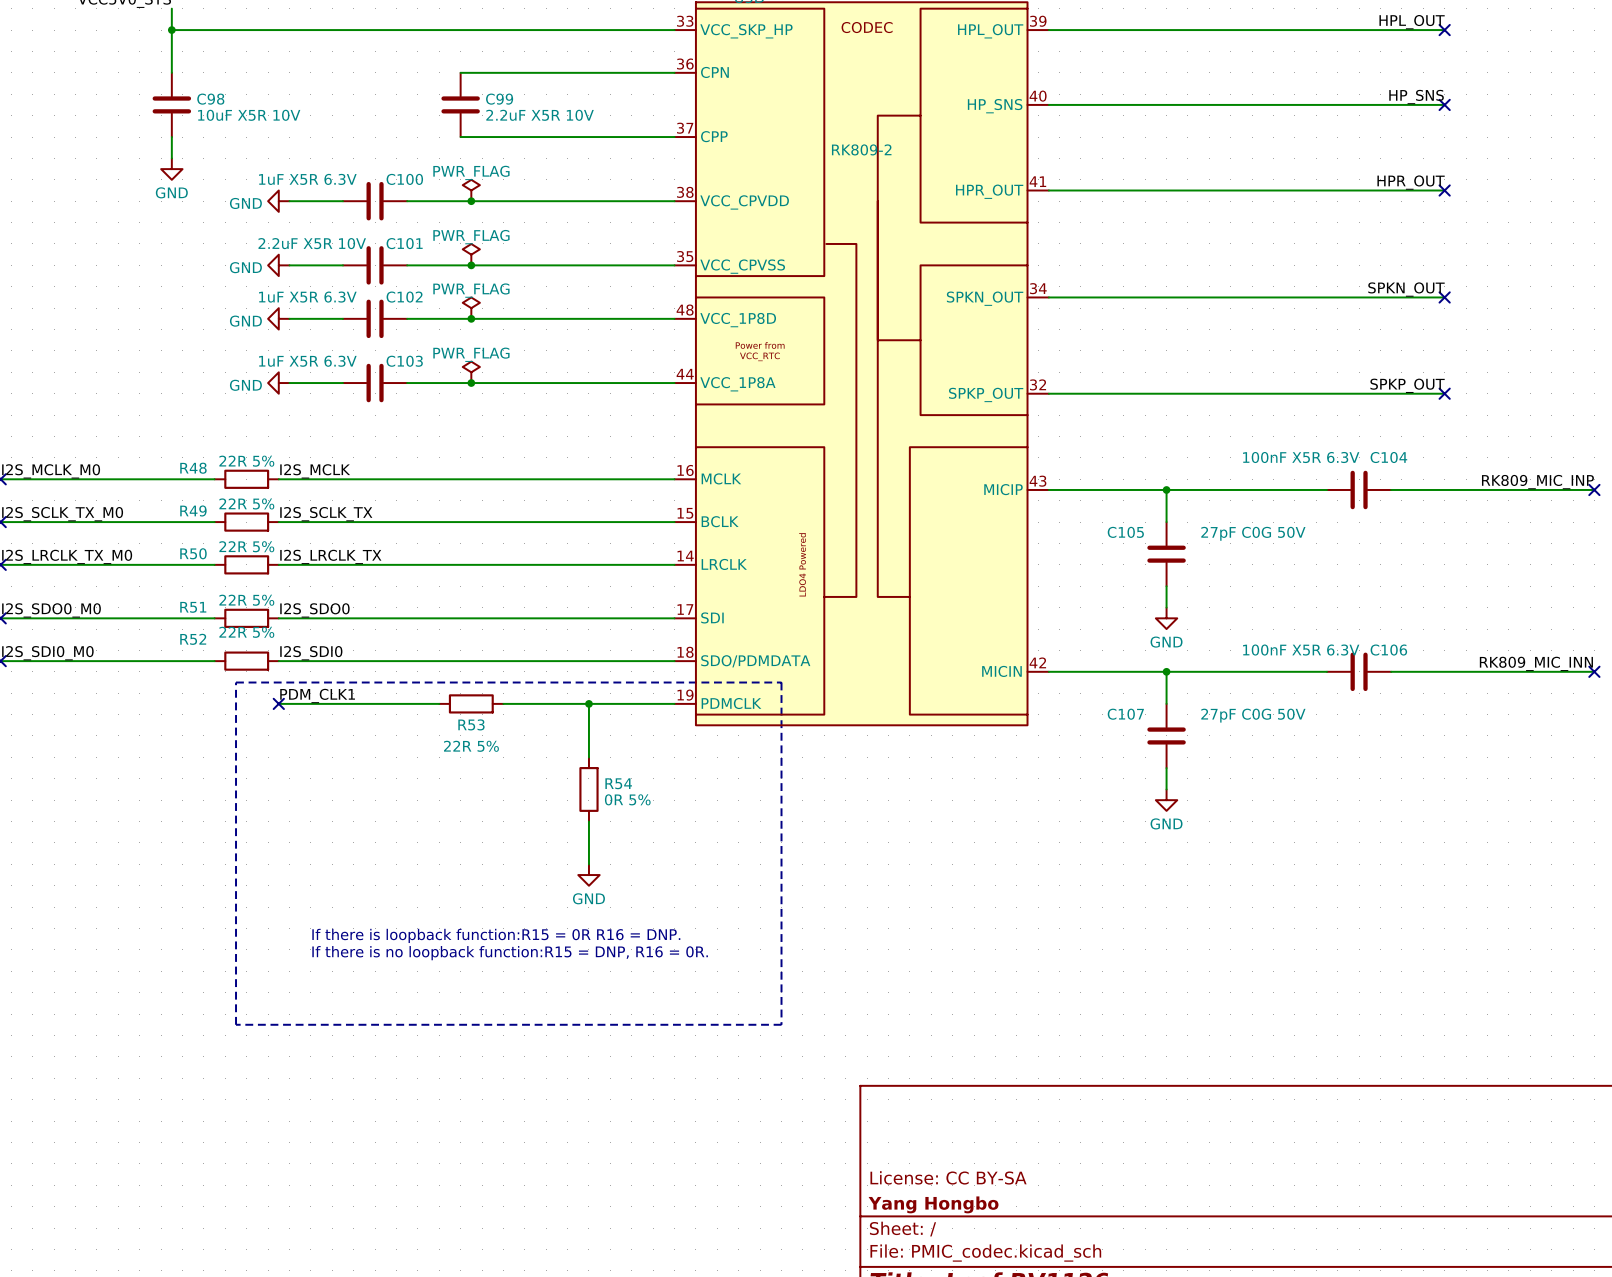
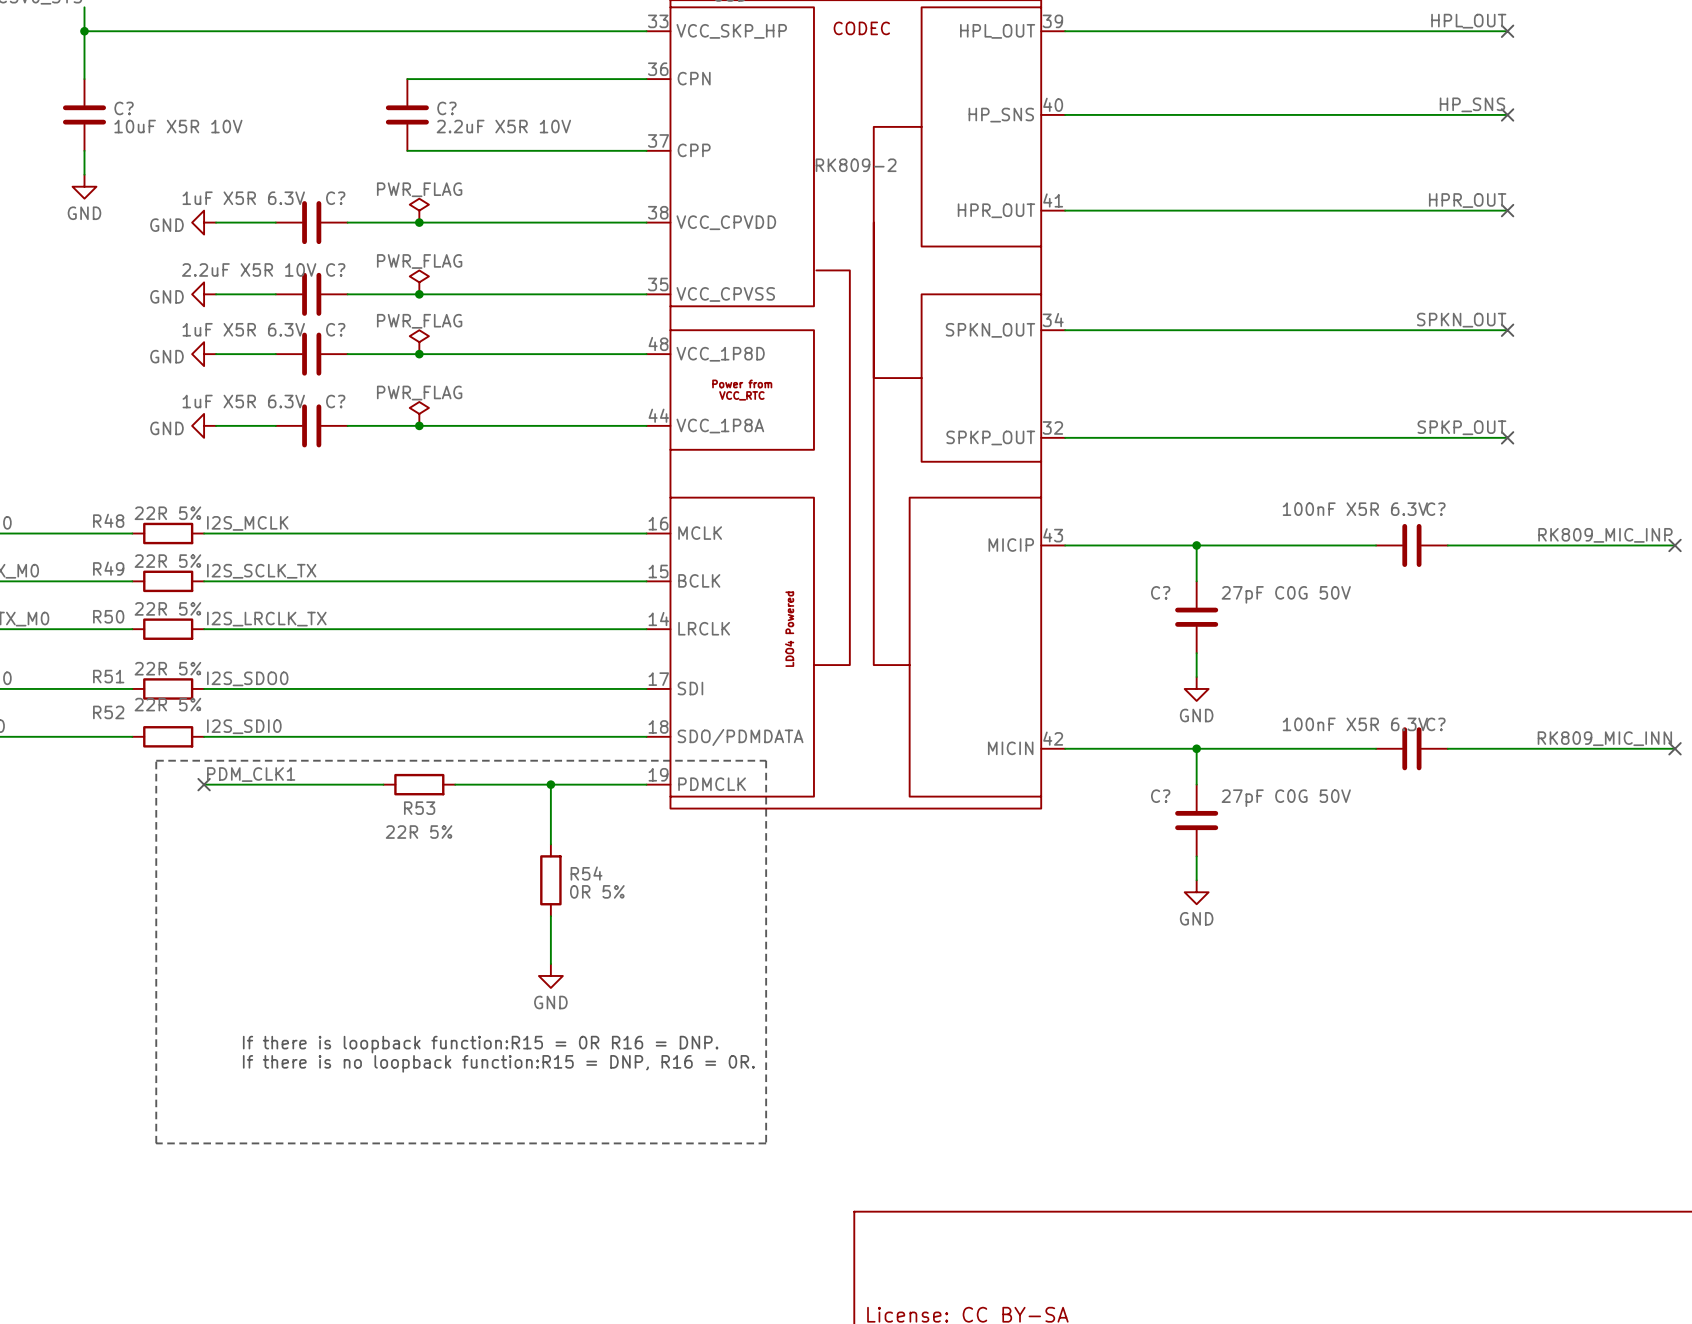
C98 name: C98 (210, 99) -> C? (124, 108)
C99 name: C99 (499, 99) -> C? (446, 108)
C100 name: C100 (404, 179) -> C? (335, 198)
C101 name: C101 (404, 243) -> C? (335, 269)
C102 name: C102 (404, 297) -> C? (335, 329)
C103 name: C103 (404, 361) -> C? (335, 401)
C104 name: C104 (1388, 457) -> C? (1435, 509)
C105 name: C105 (1125, 532) -> C? (1160, 592)
C106 name: C106 (1388, 650) -> C? (1435, 724)
C107 name: C107 (1125, 714) -> C? (1160, 796)

